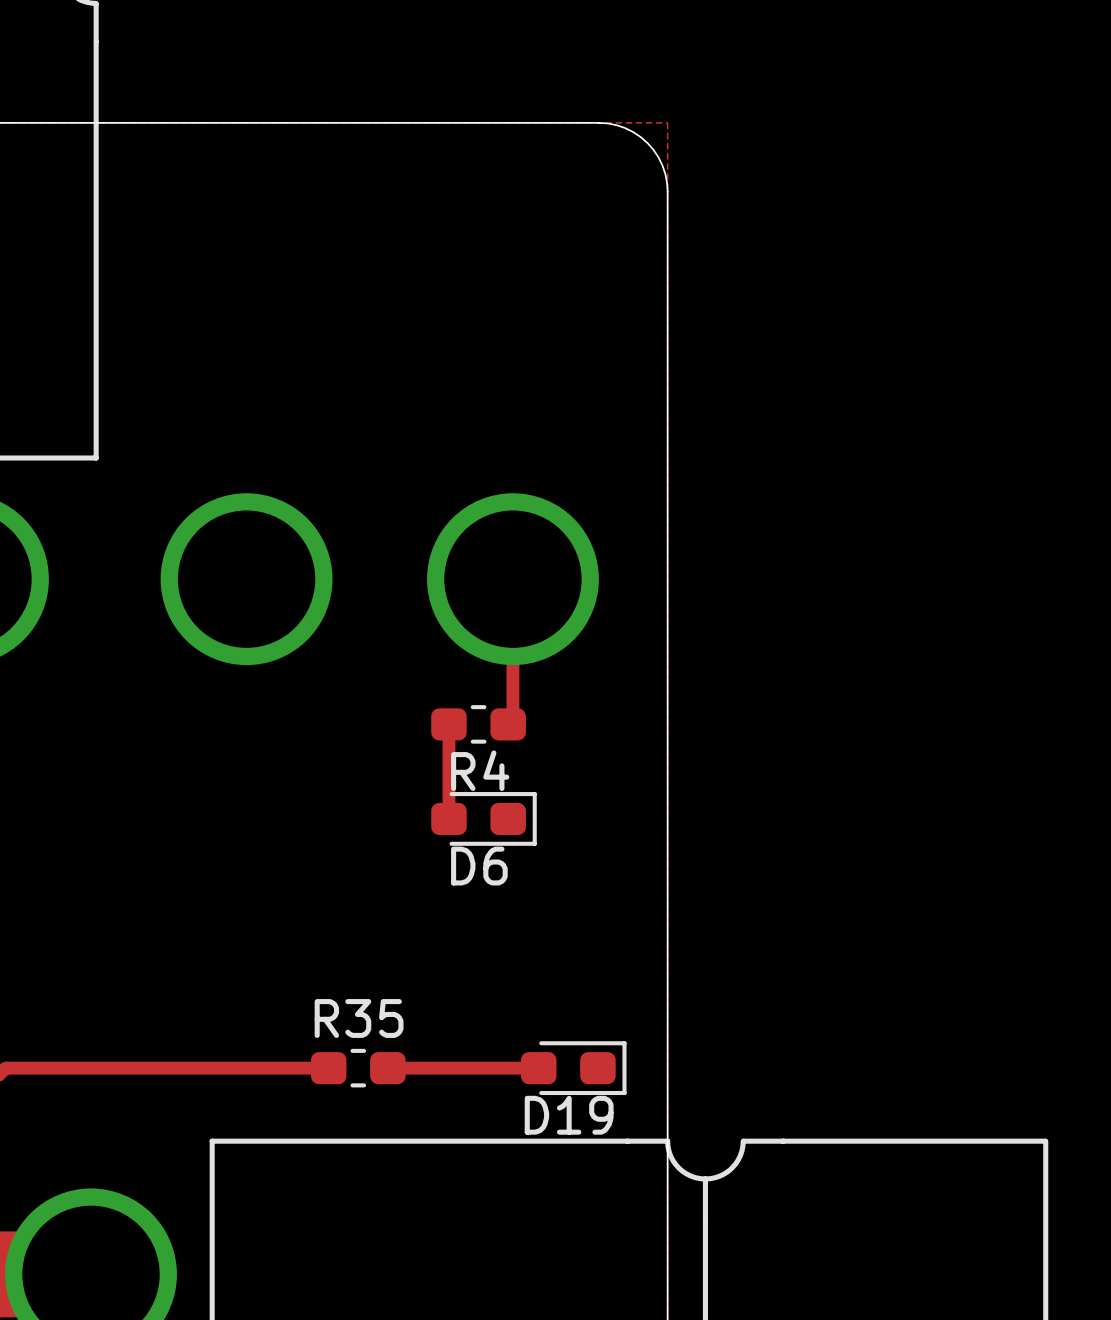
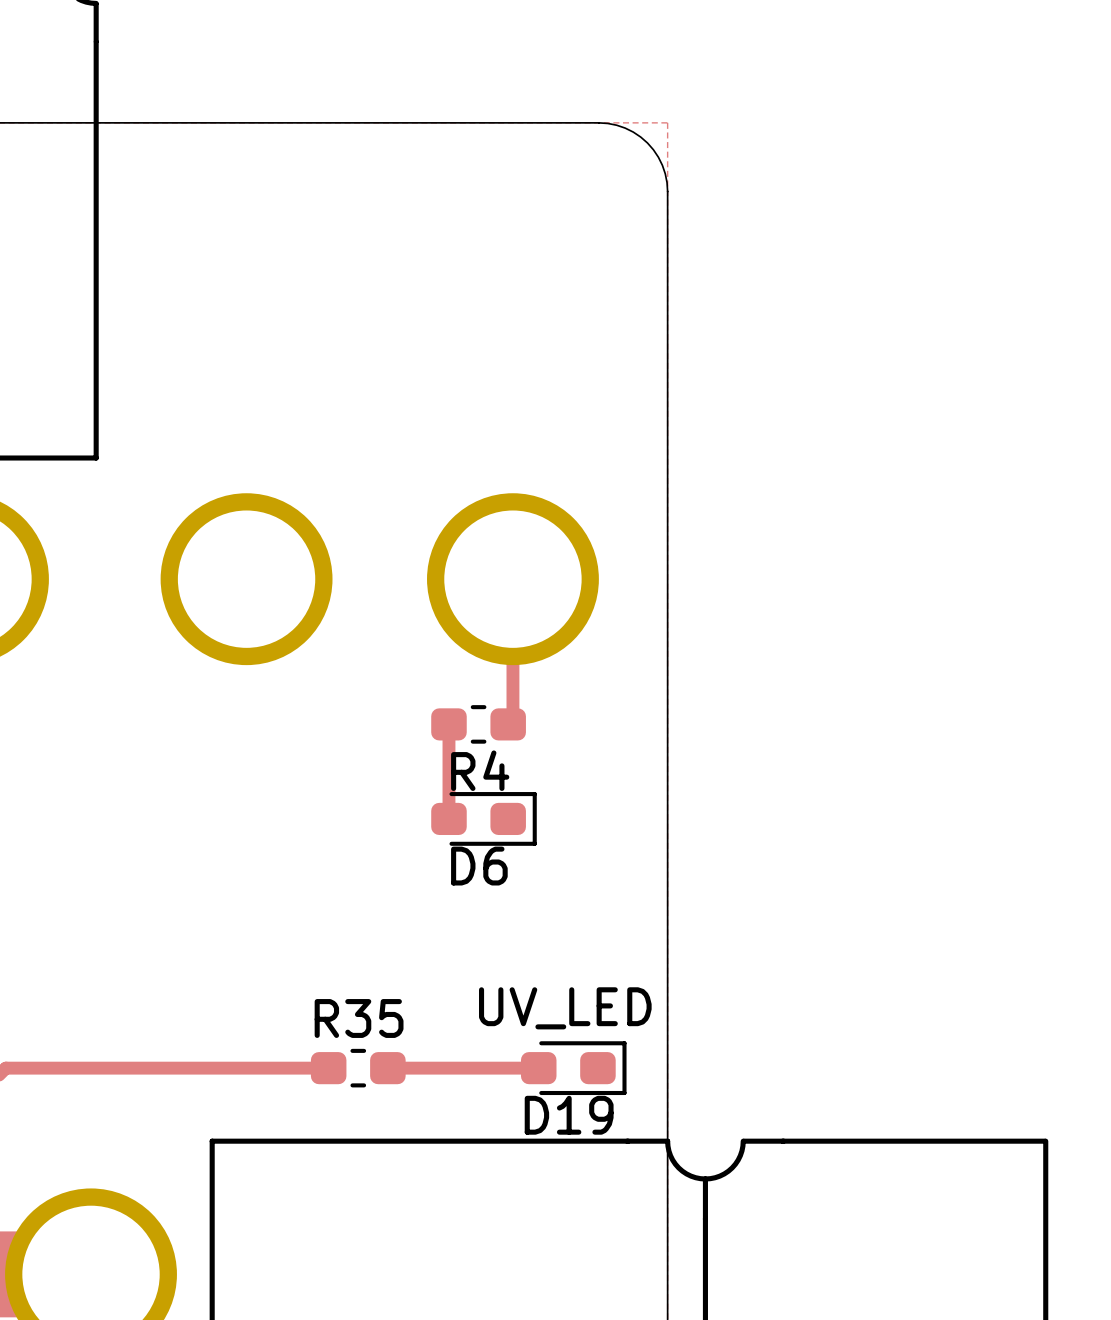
text: none -> UV_LED (565, 1008)

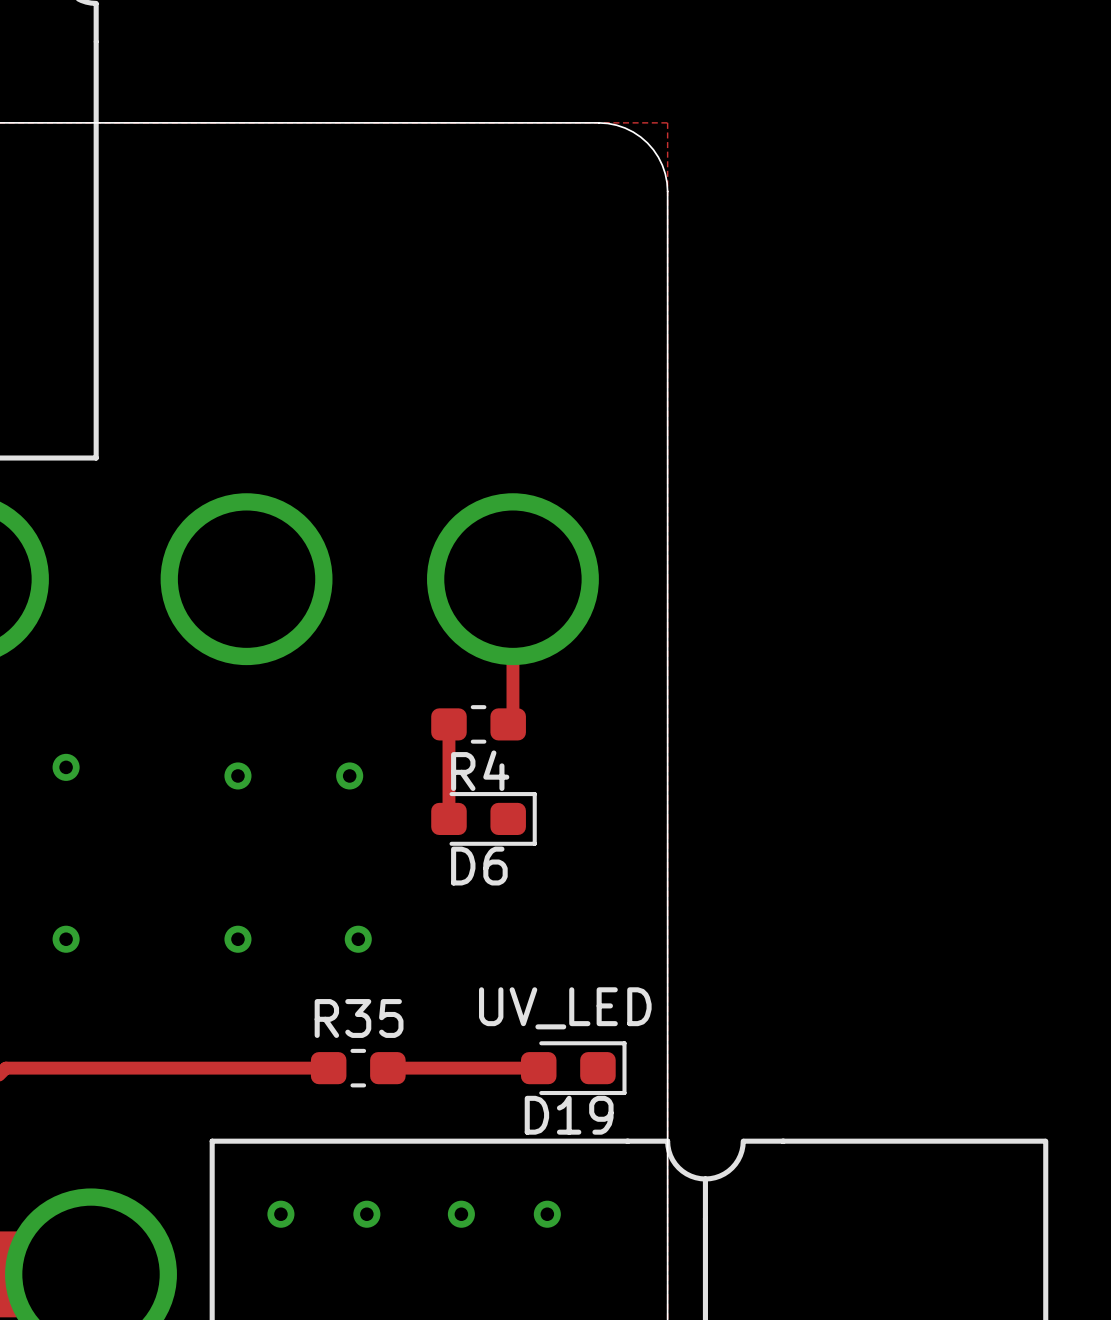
via: none -> (66, 767)
via: none -> (237, 775)
via: none -> (349, 775)
via: none -> (66, 939)
via: none -> (237, 939)
via: none -> (358, 939)
via: none -> (280, 1214)
via: none -> (366, 1214)
via: none -> (461, 1214)
via: none -> (547, 1214)

